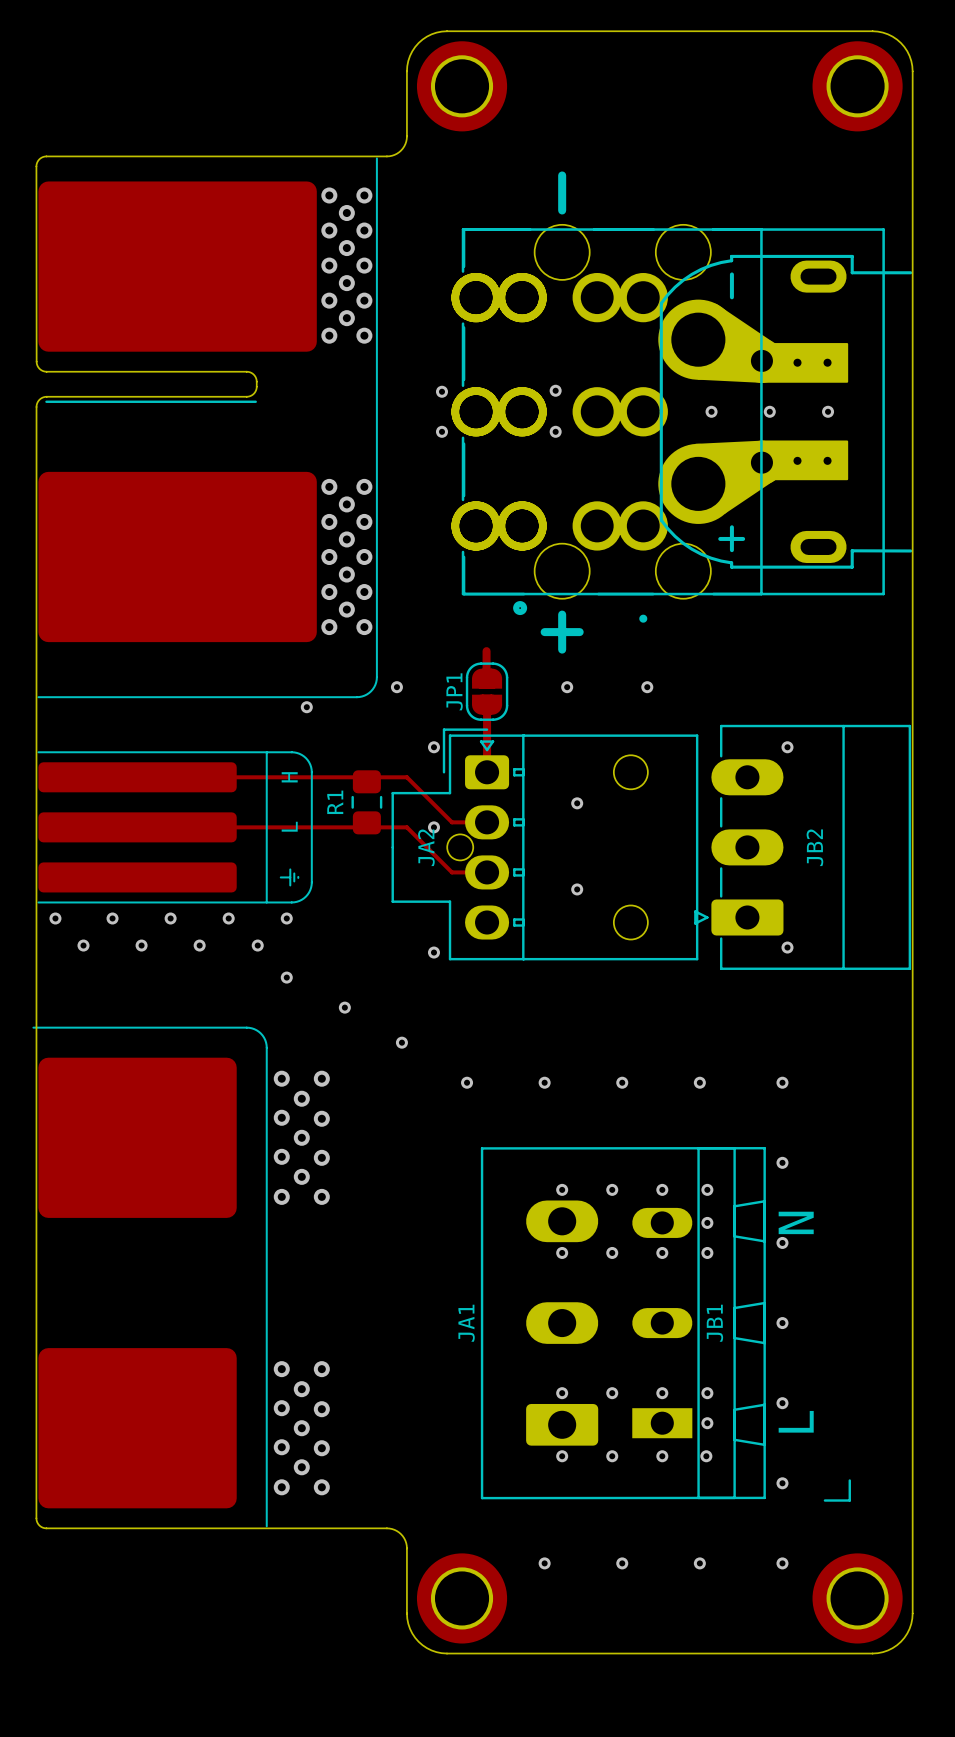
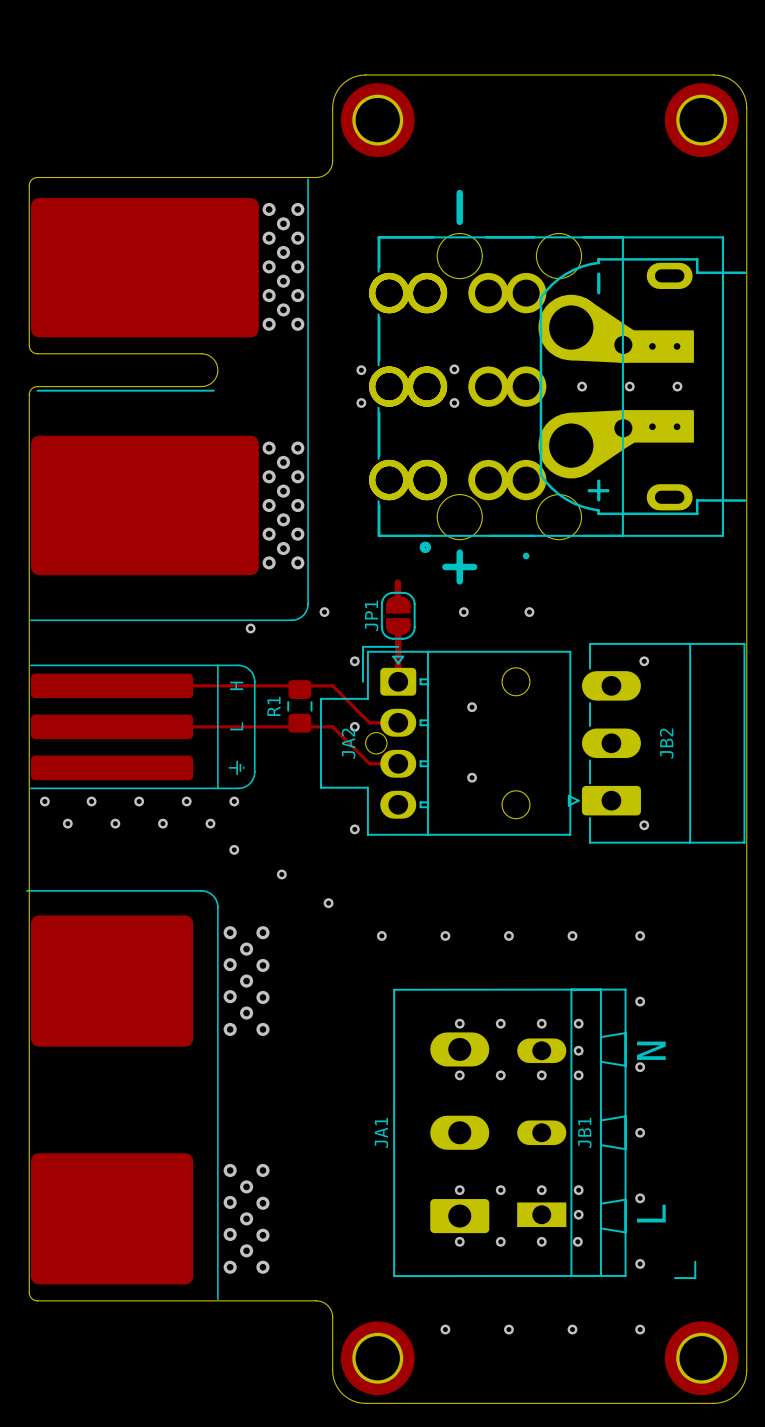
part footprint: [32, 155, 388, 1529] -> [26, 177, 317, 1302]

